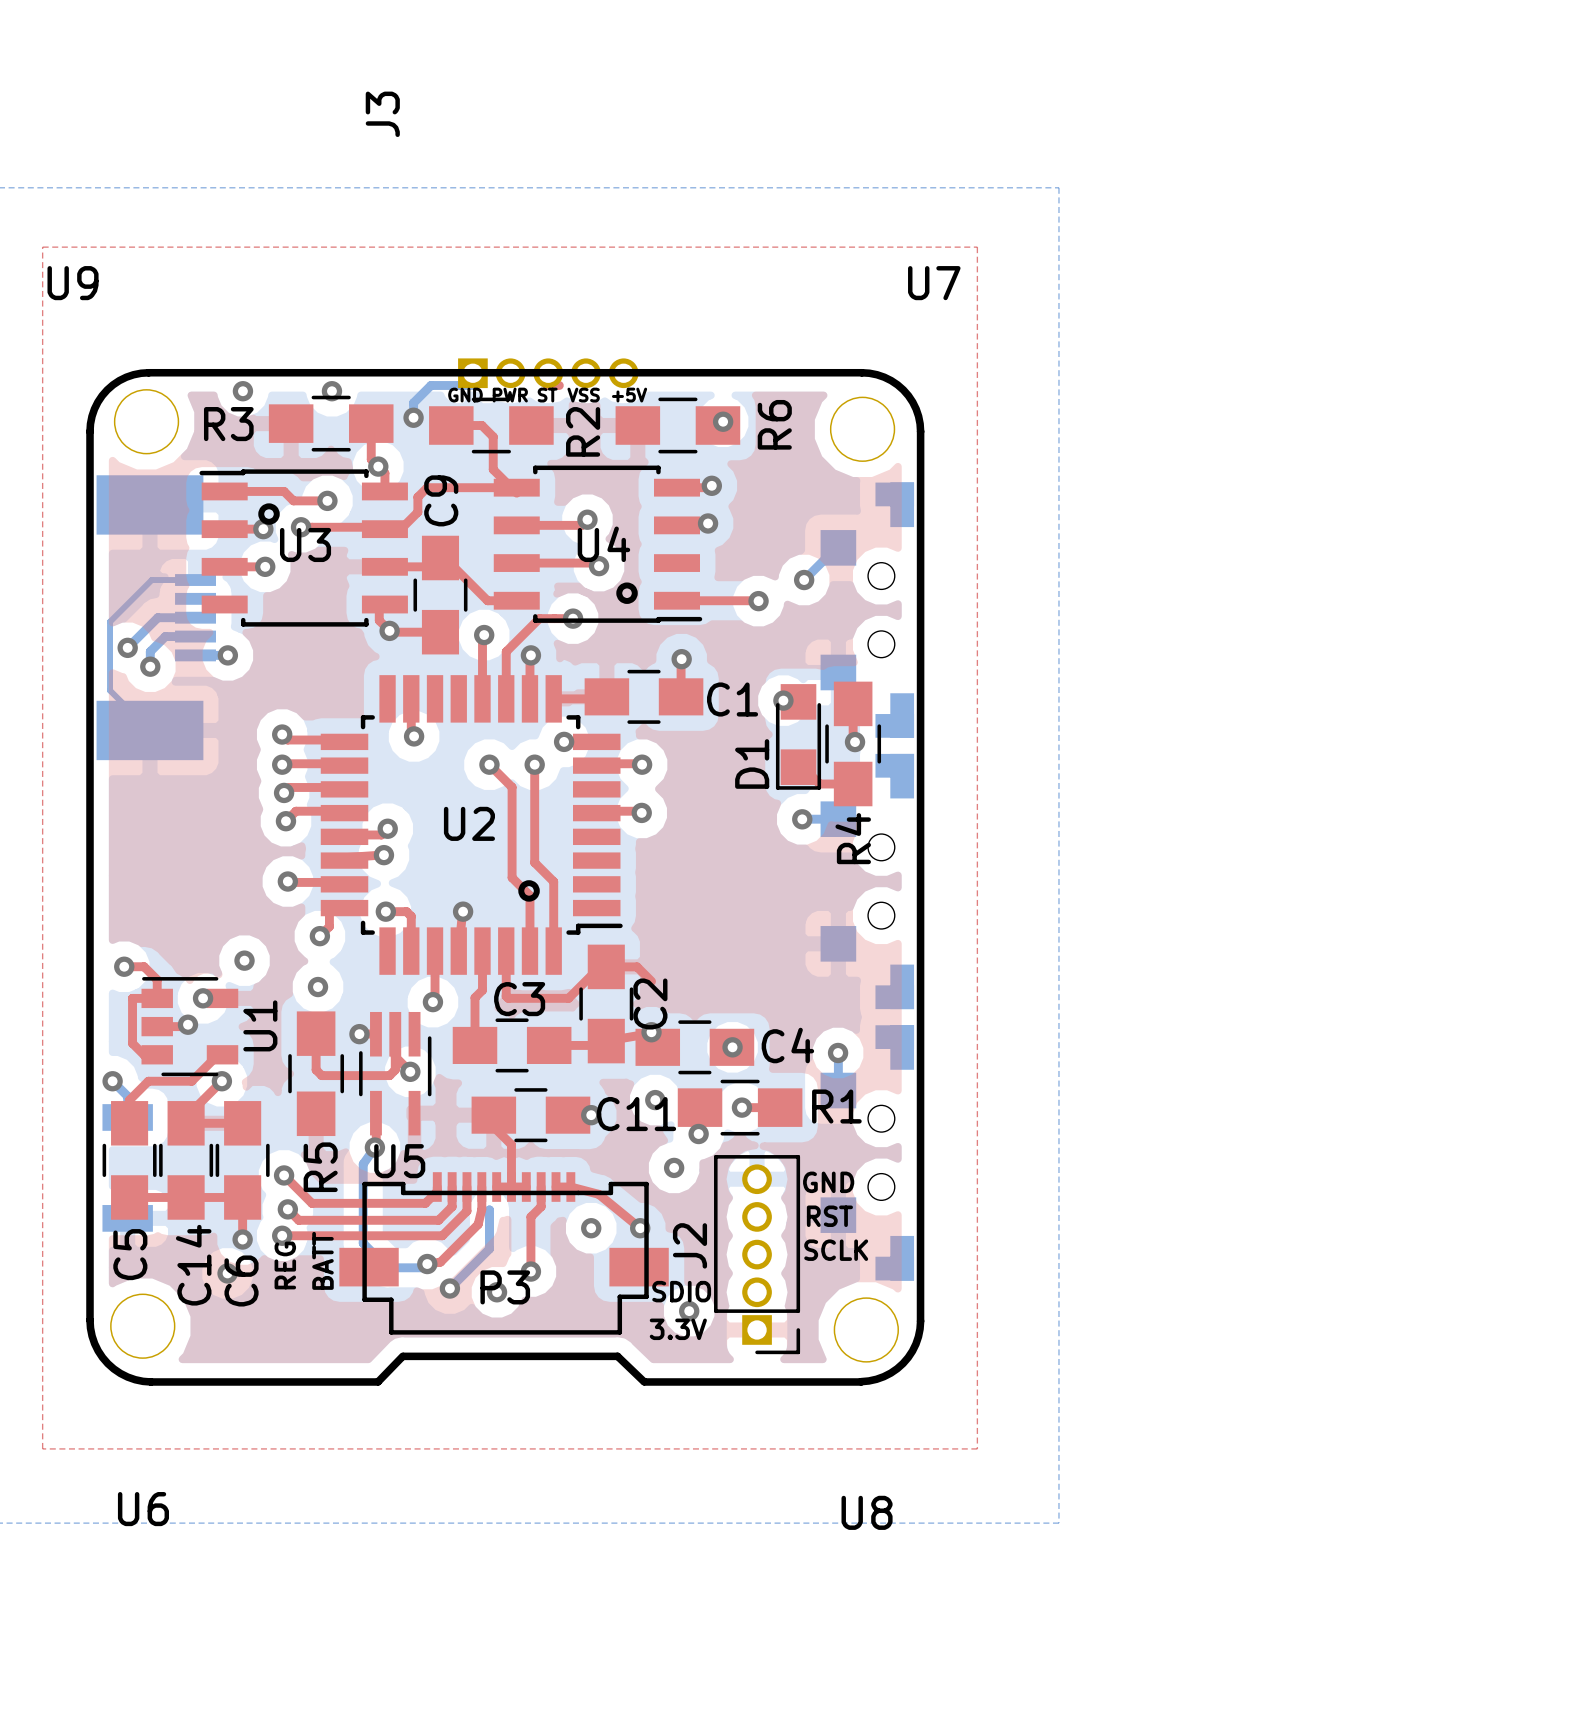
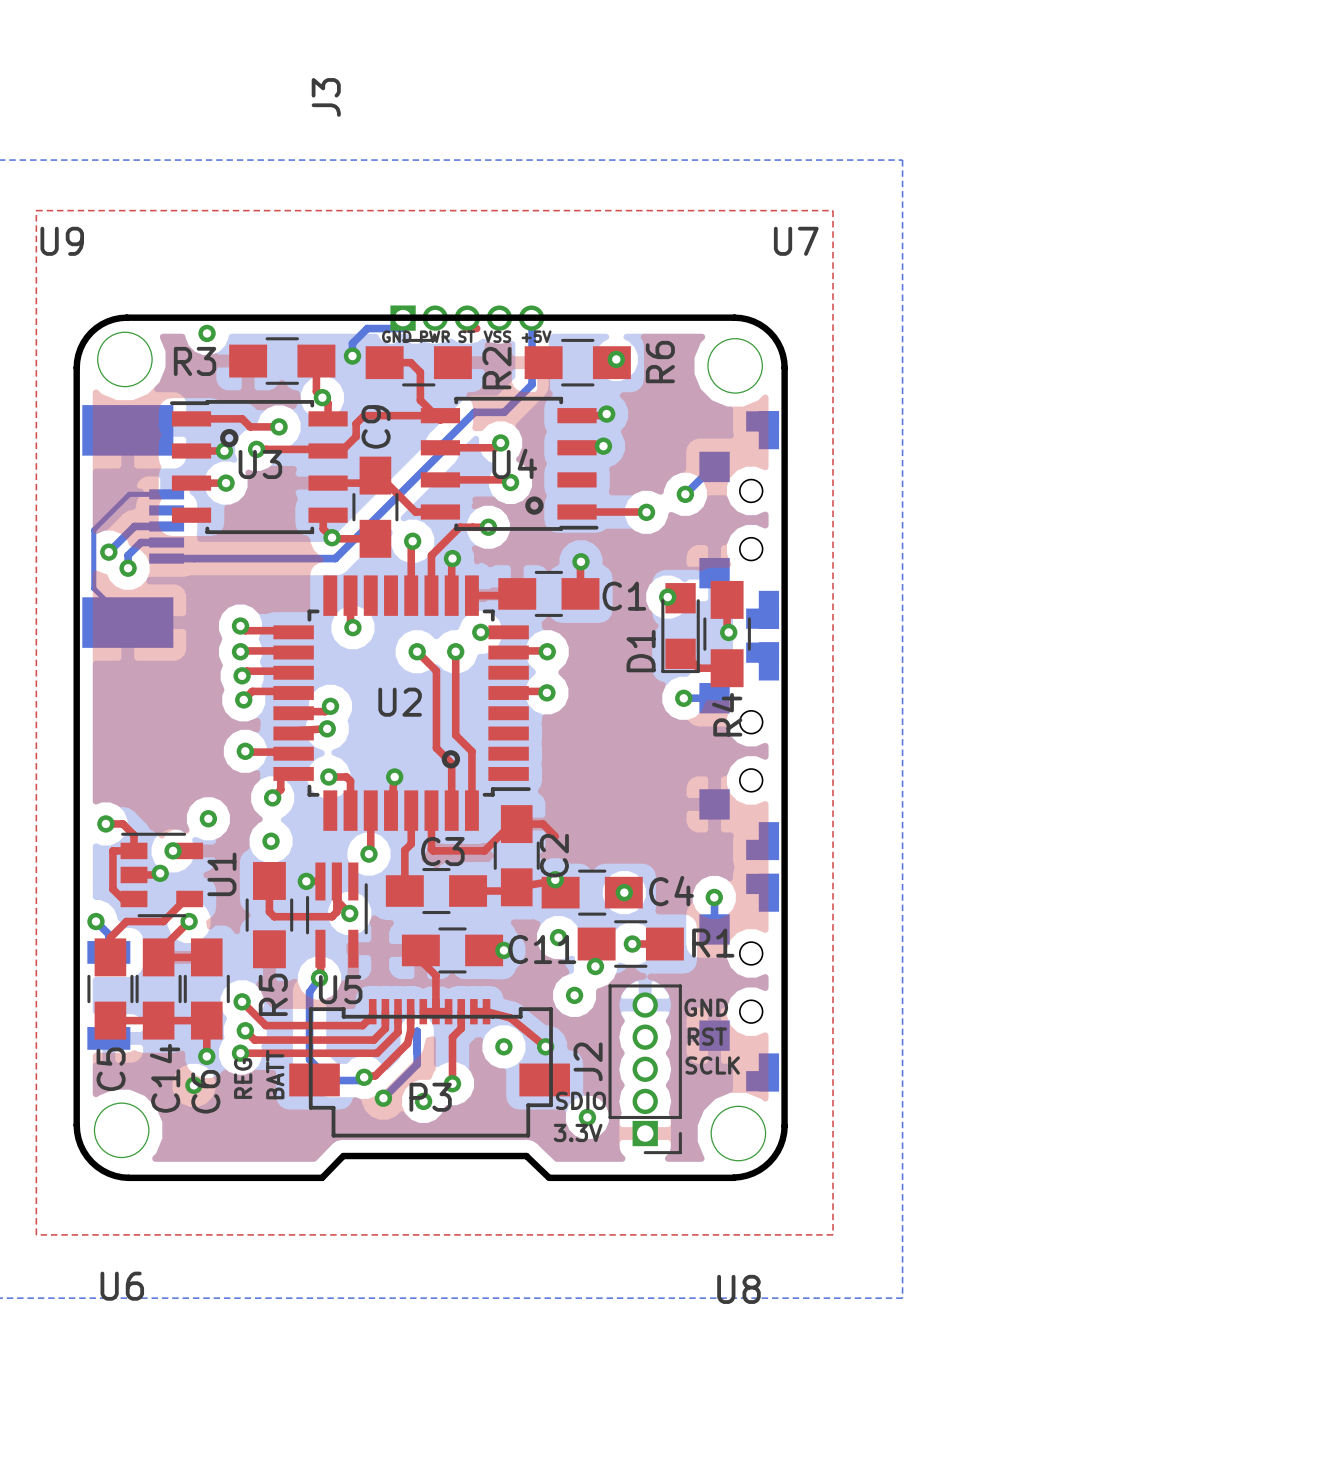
bottom track: none -> (532, 328) (532, 384) (504, 412) (474, 412) (442, 444) (442, 451) (335, 558) (194, 558)
via: (331, 391) -> none
via: (227, 655) -> none

